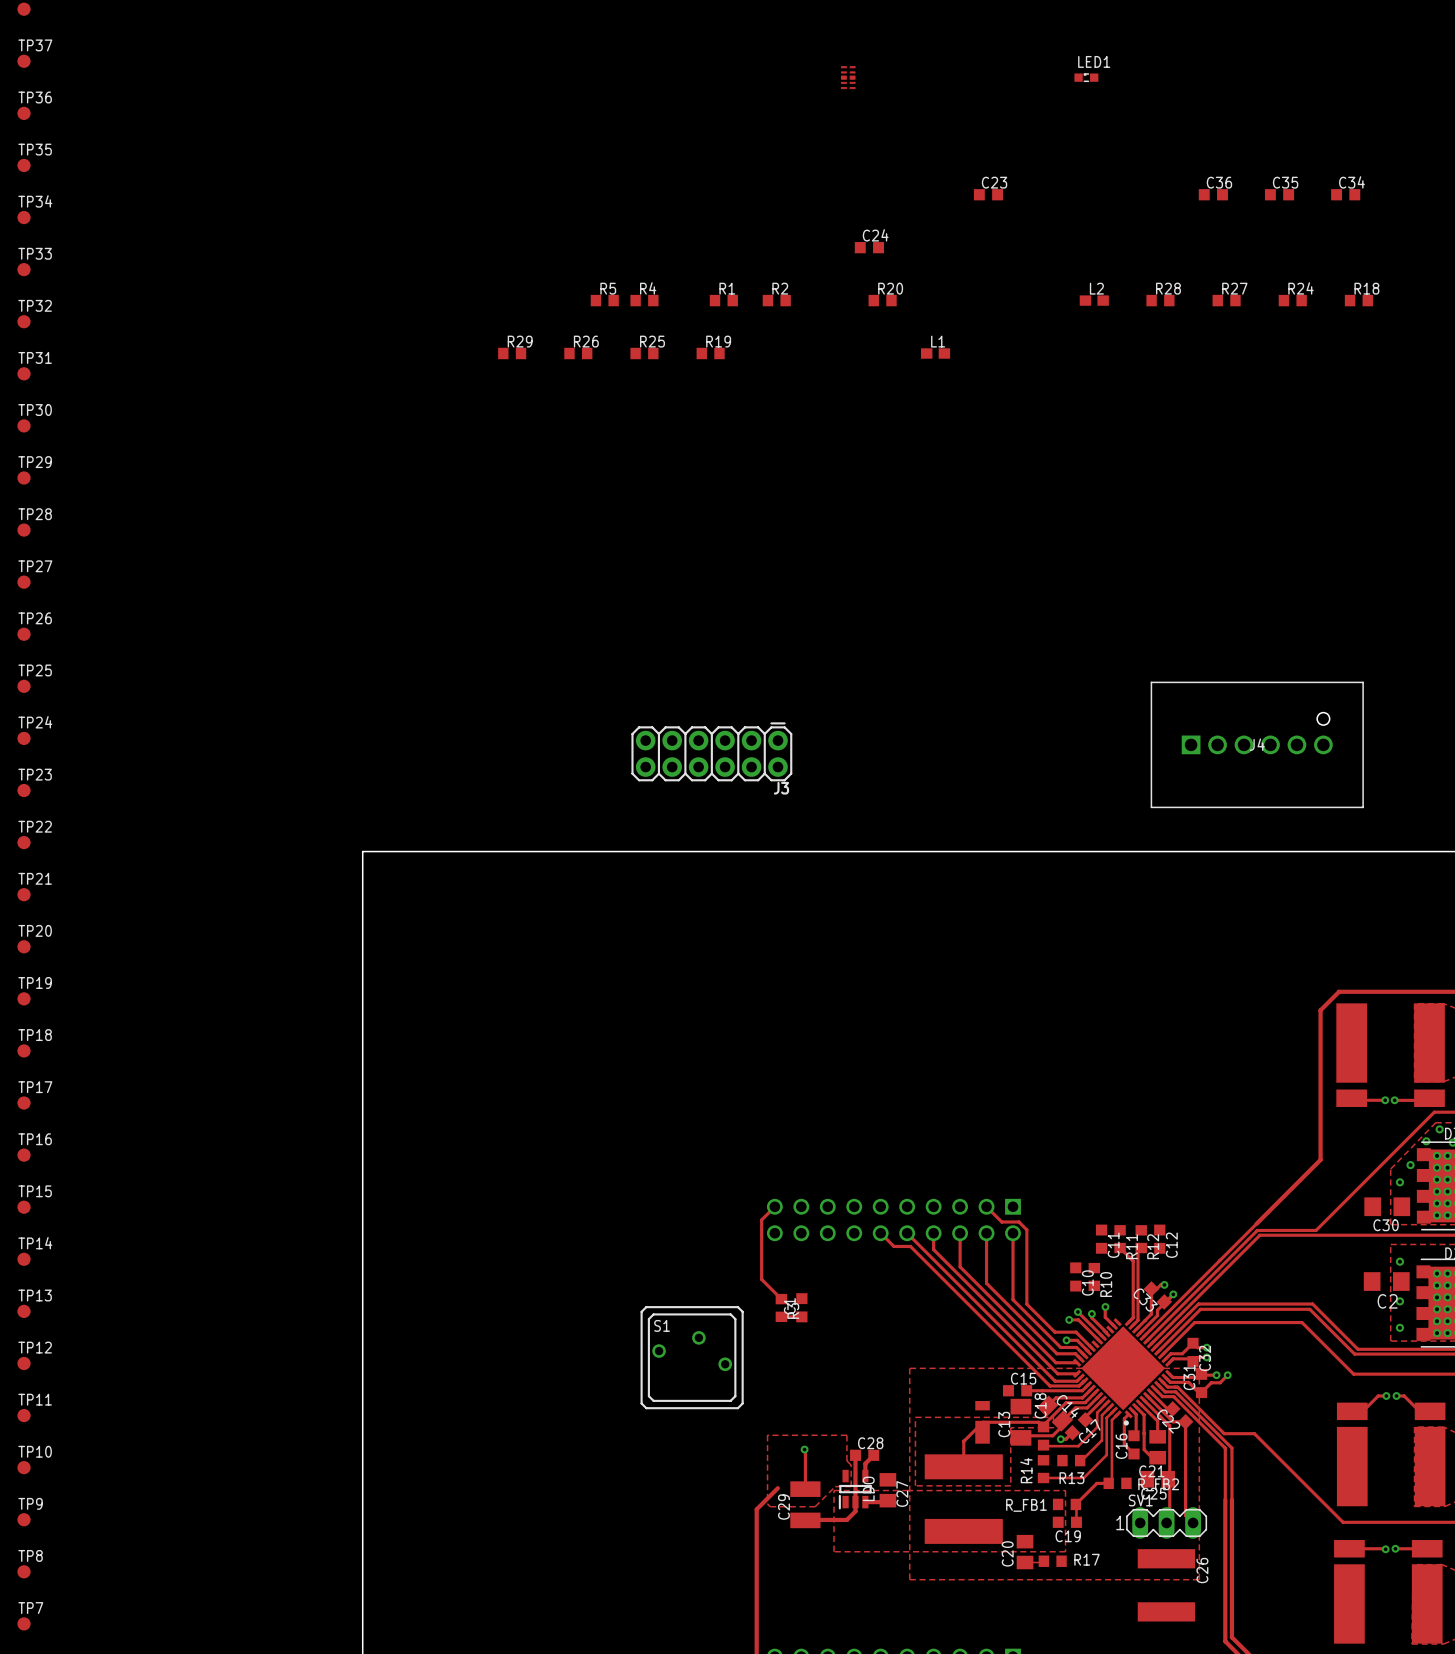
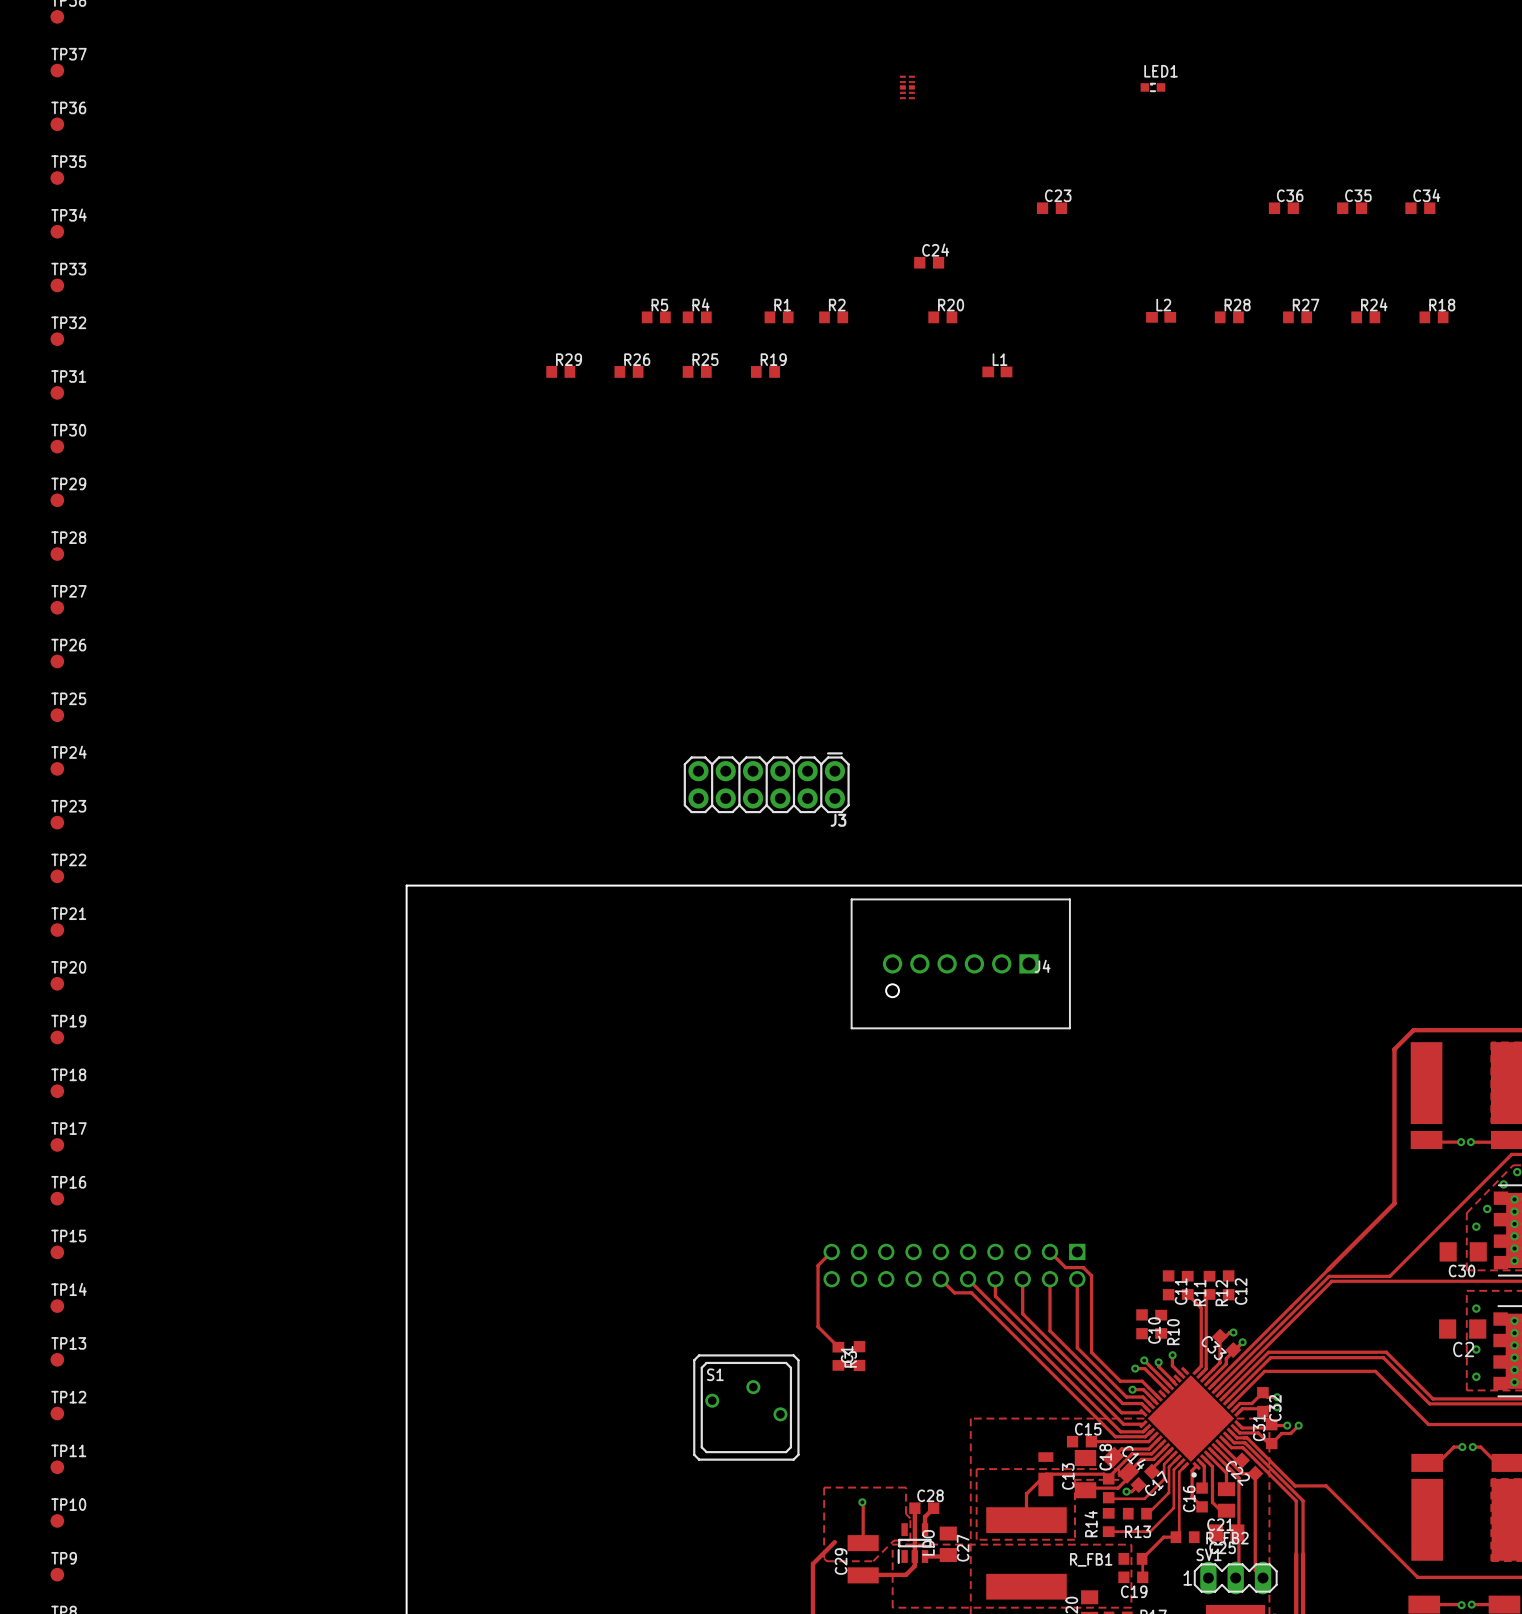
J4 rotation: 0° (1257, 744) -> 180° (960, 963)
J4 position: (1257, 744) -> (960, 963)
J4 name position: J4 (1257, 744) -> J4 (1042, 966)

